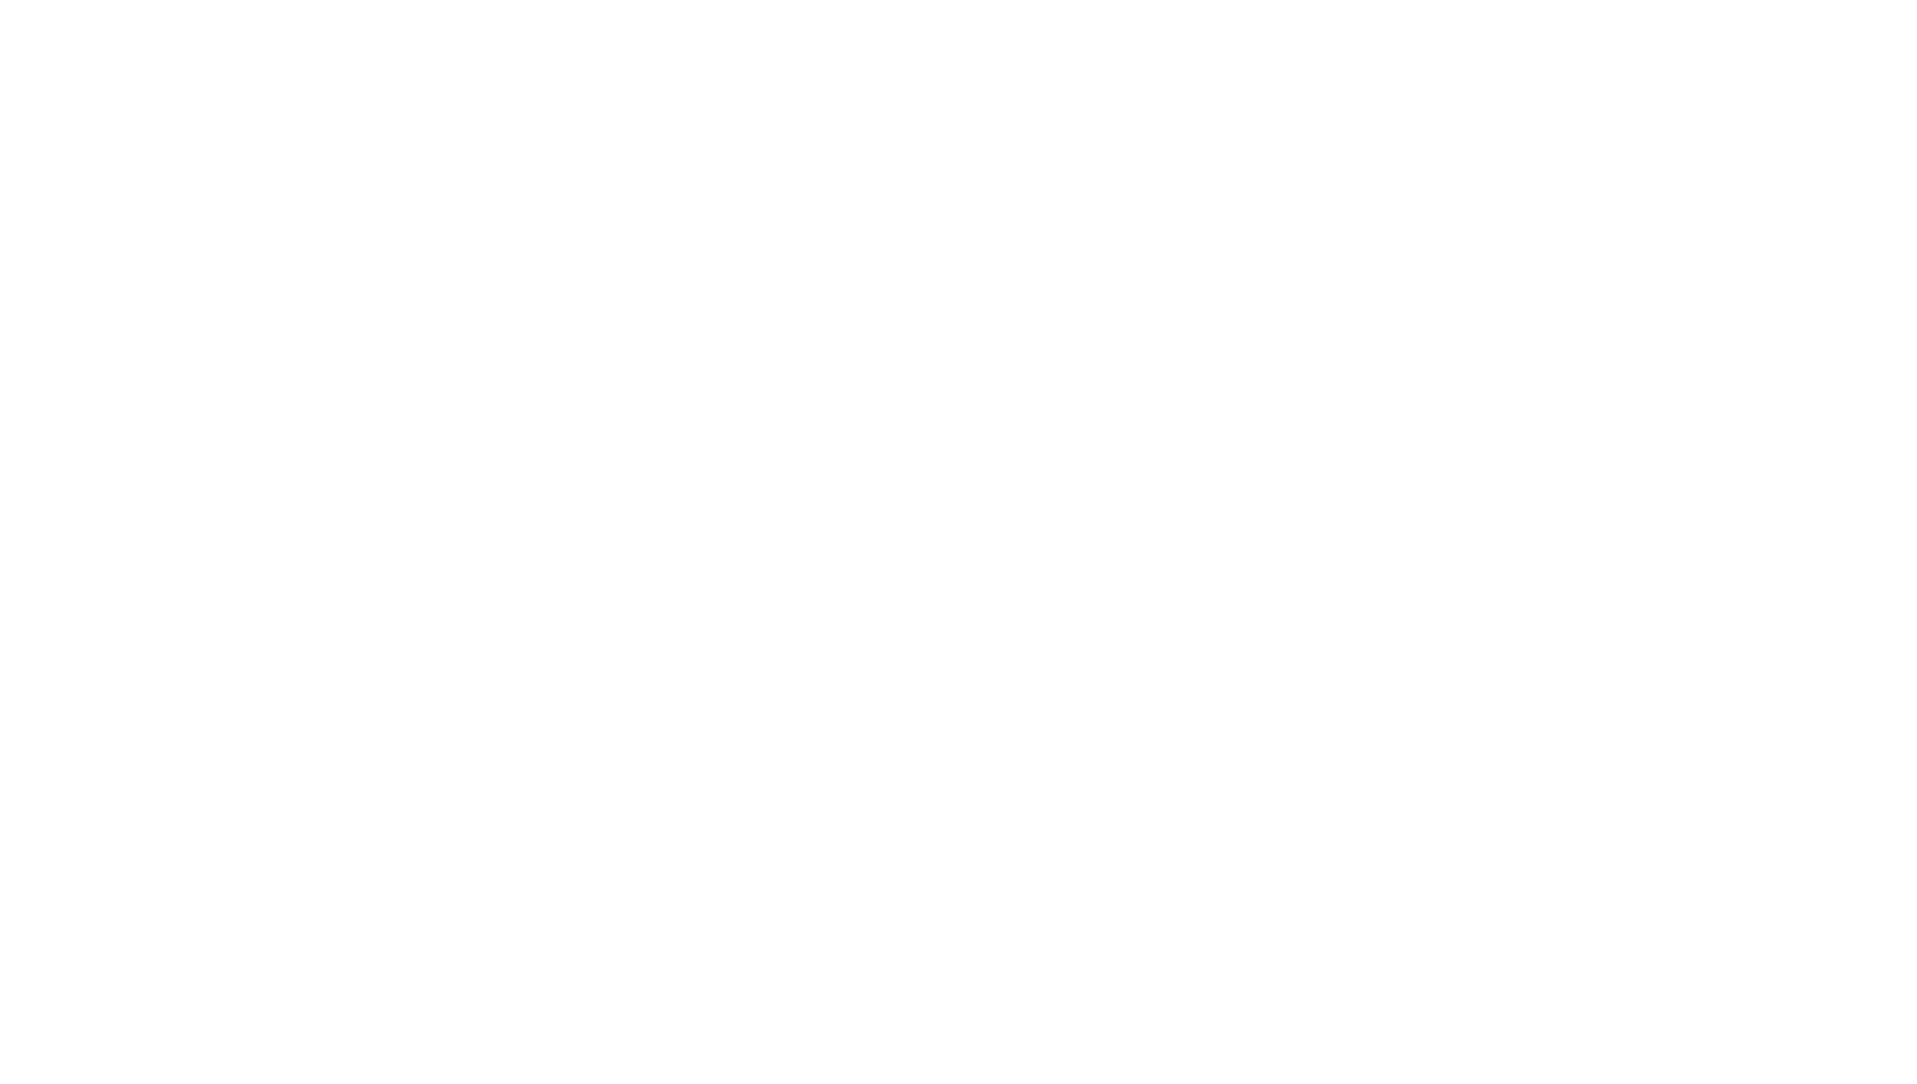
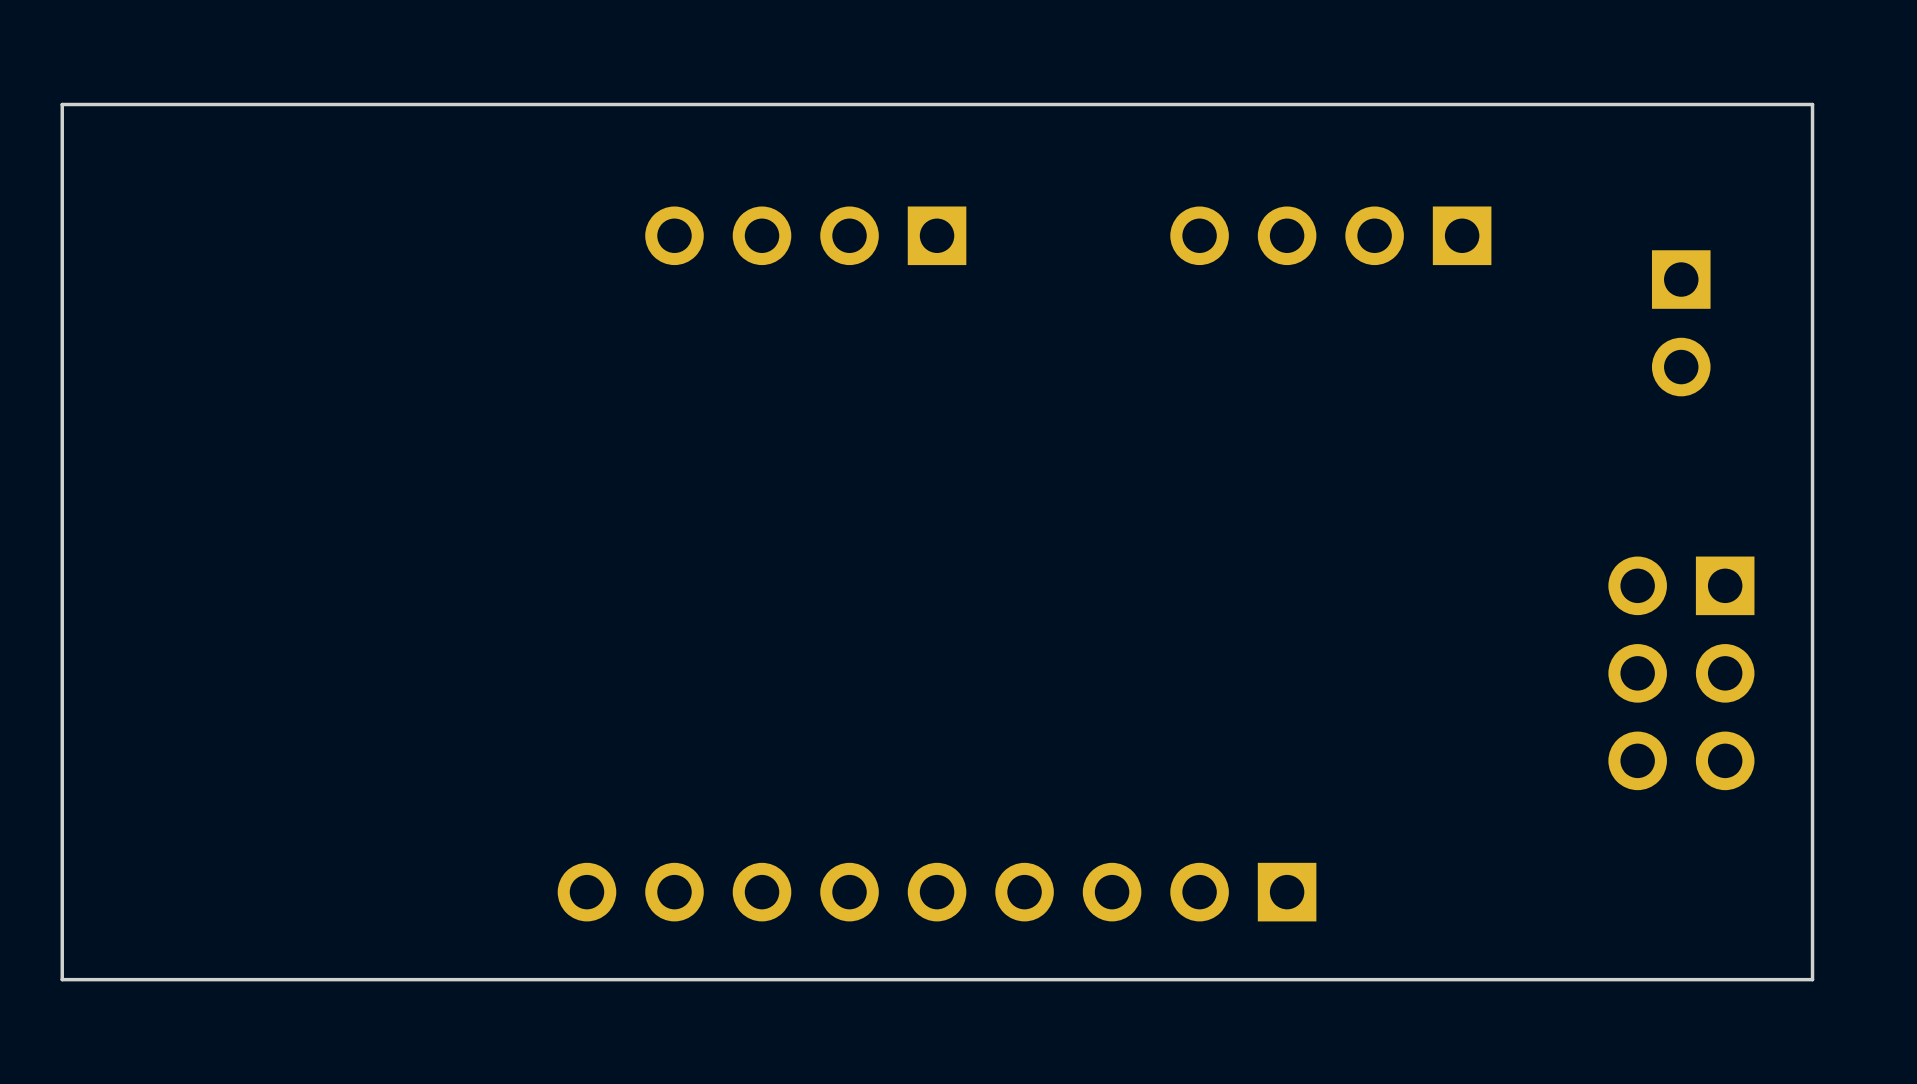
board edge: none -> (1812, 104) (62, 104) (62, 979) (1812, 979) (1812, 104)
part: none -> (805, 235)
part: none -> (1330, 235)
part: none -> (1681, 323)
part: none -> (1681, 673)
part: none -> (937, 892)

